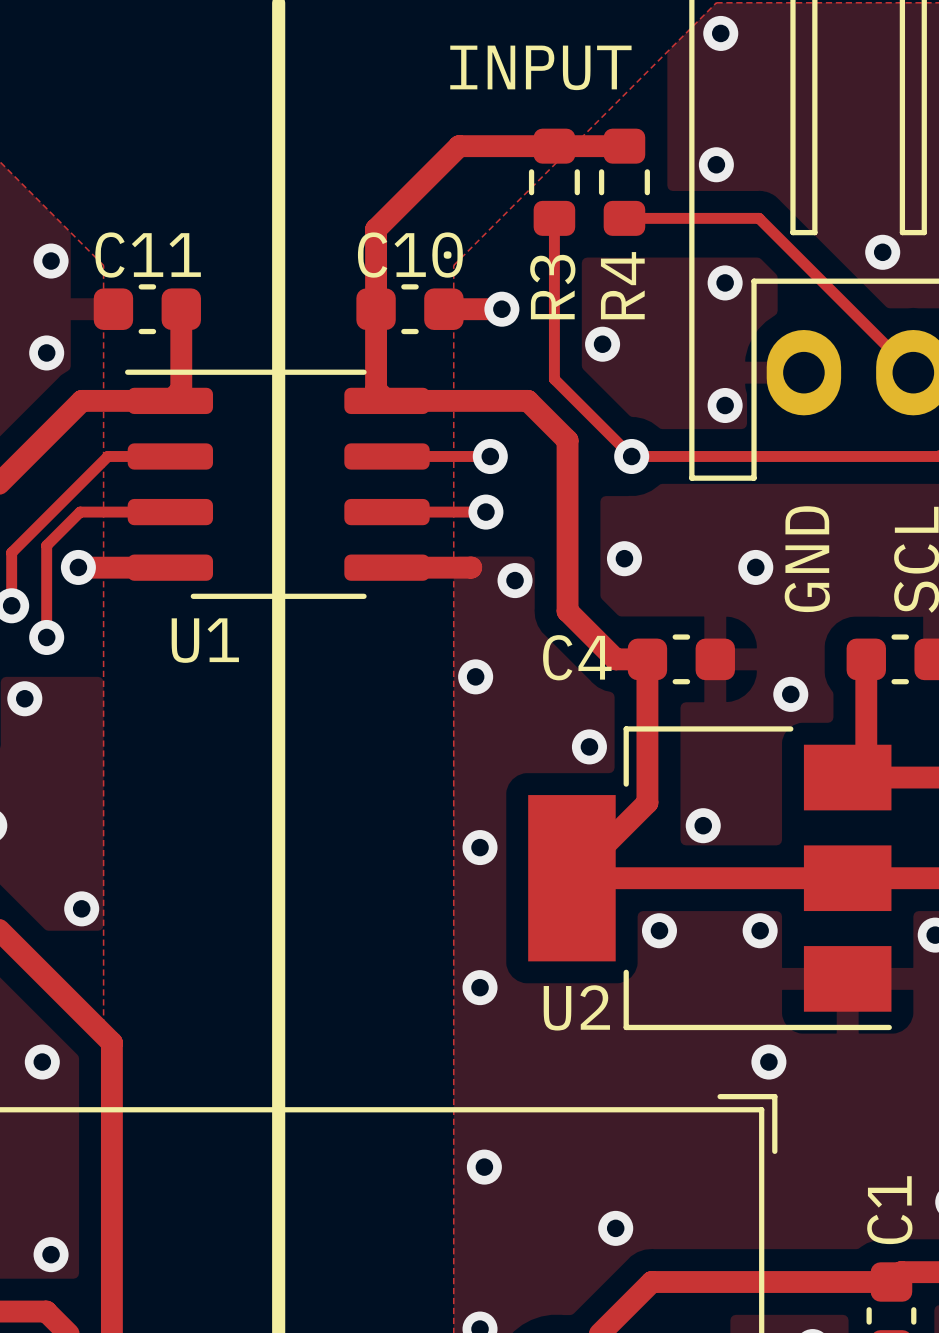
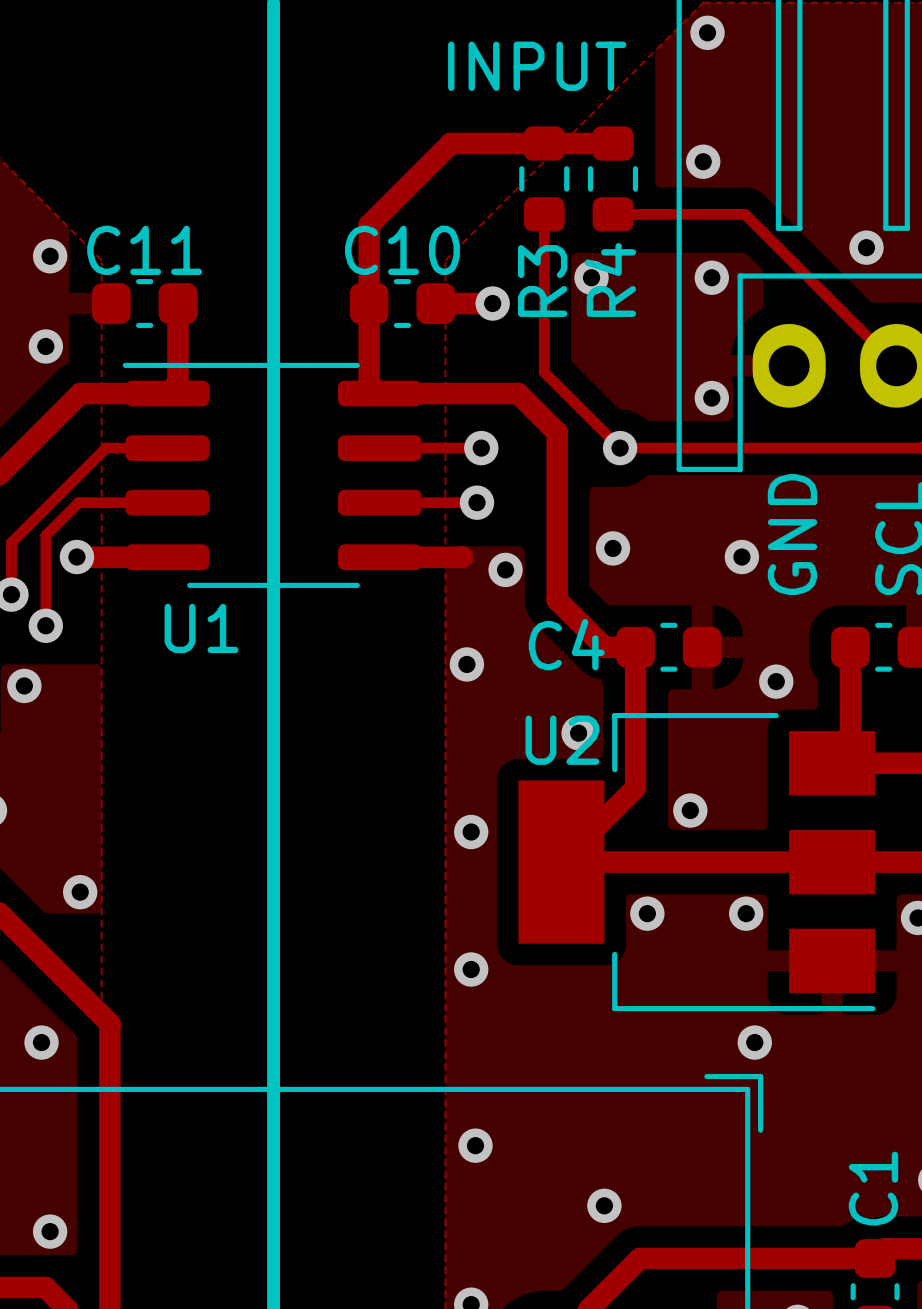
via position: (602, 344) -> (591, 277)
U2 name position: U2 (576, 1007) -> U2 (562, 740)

